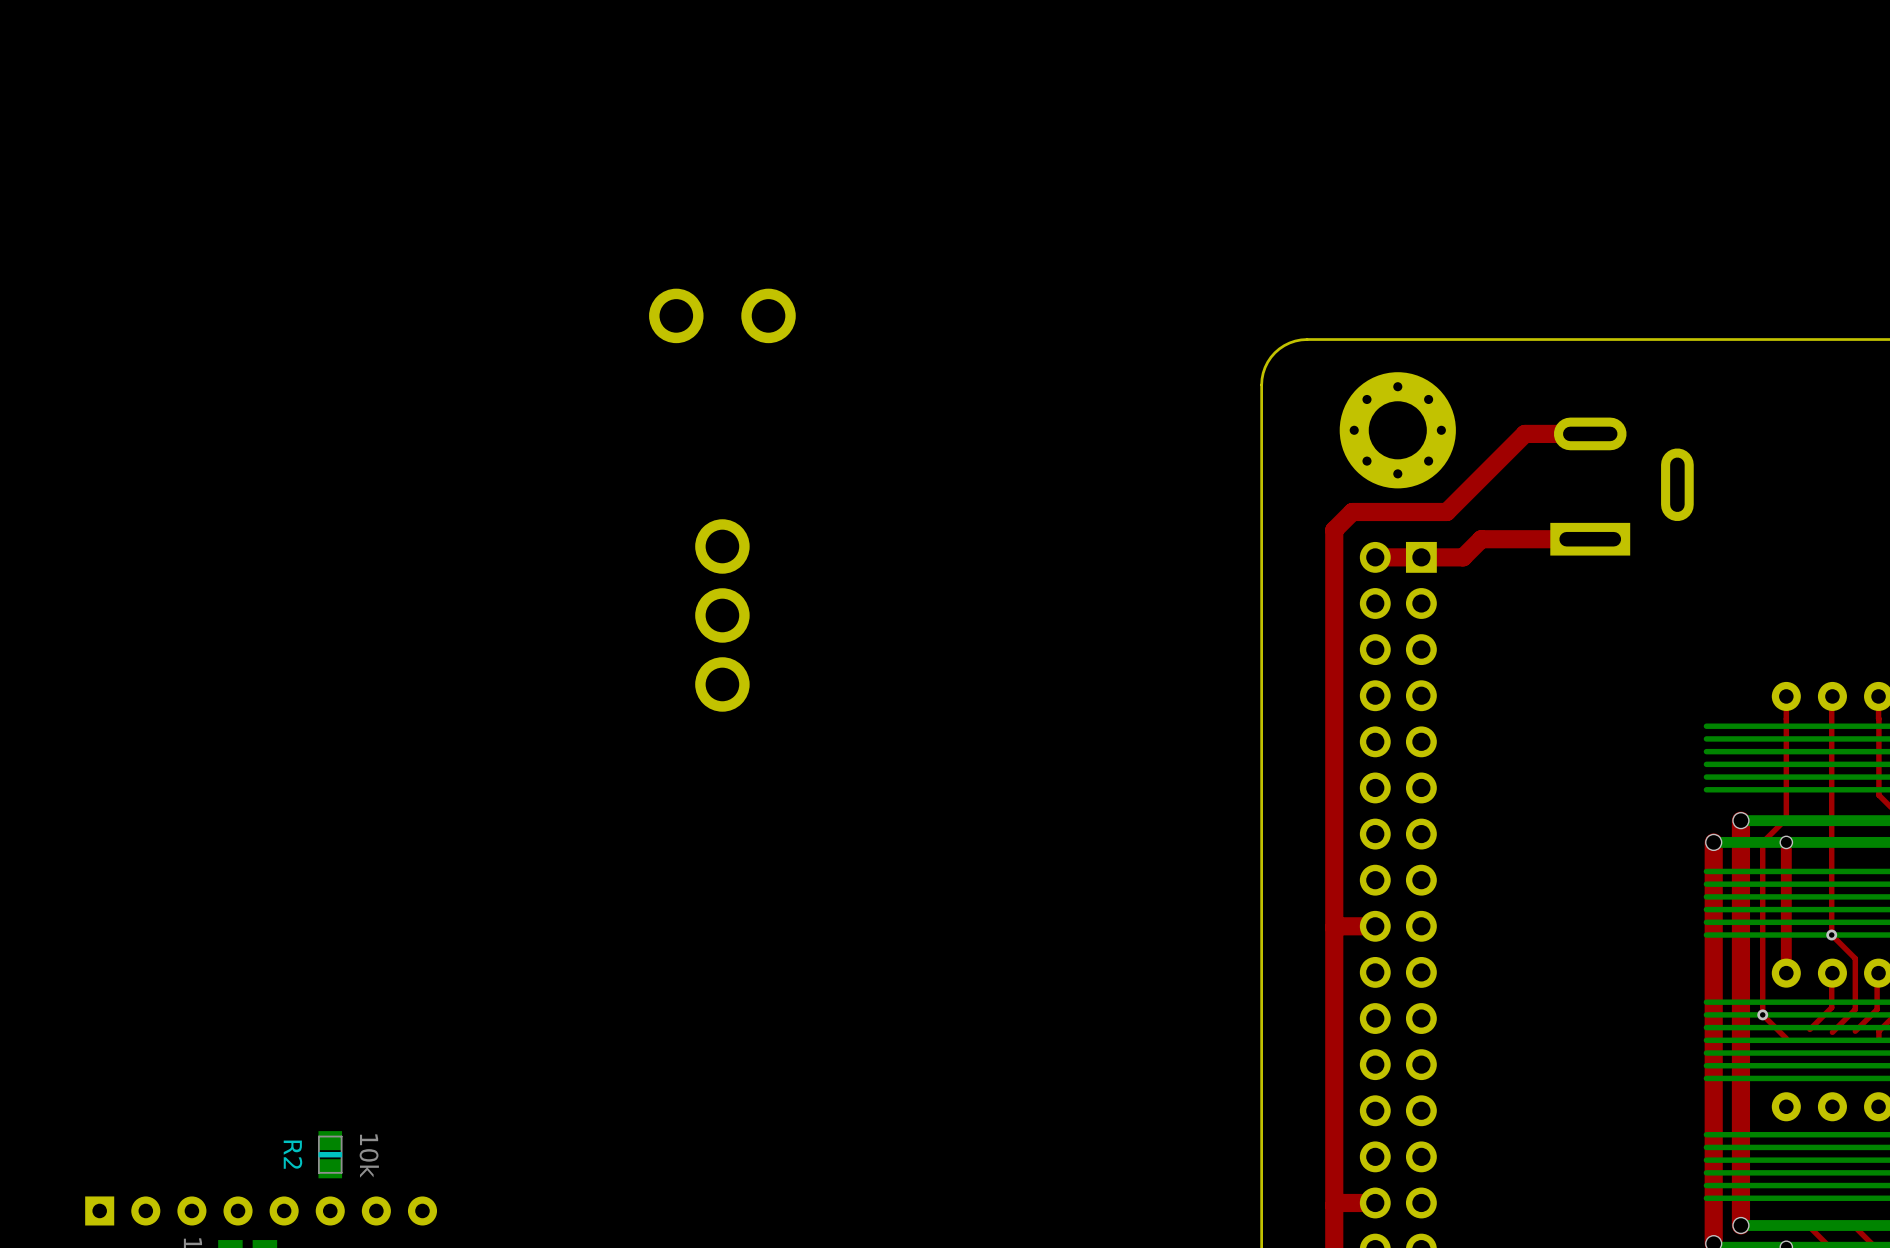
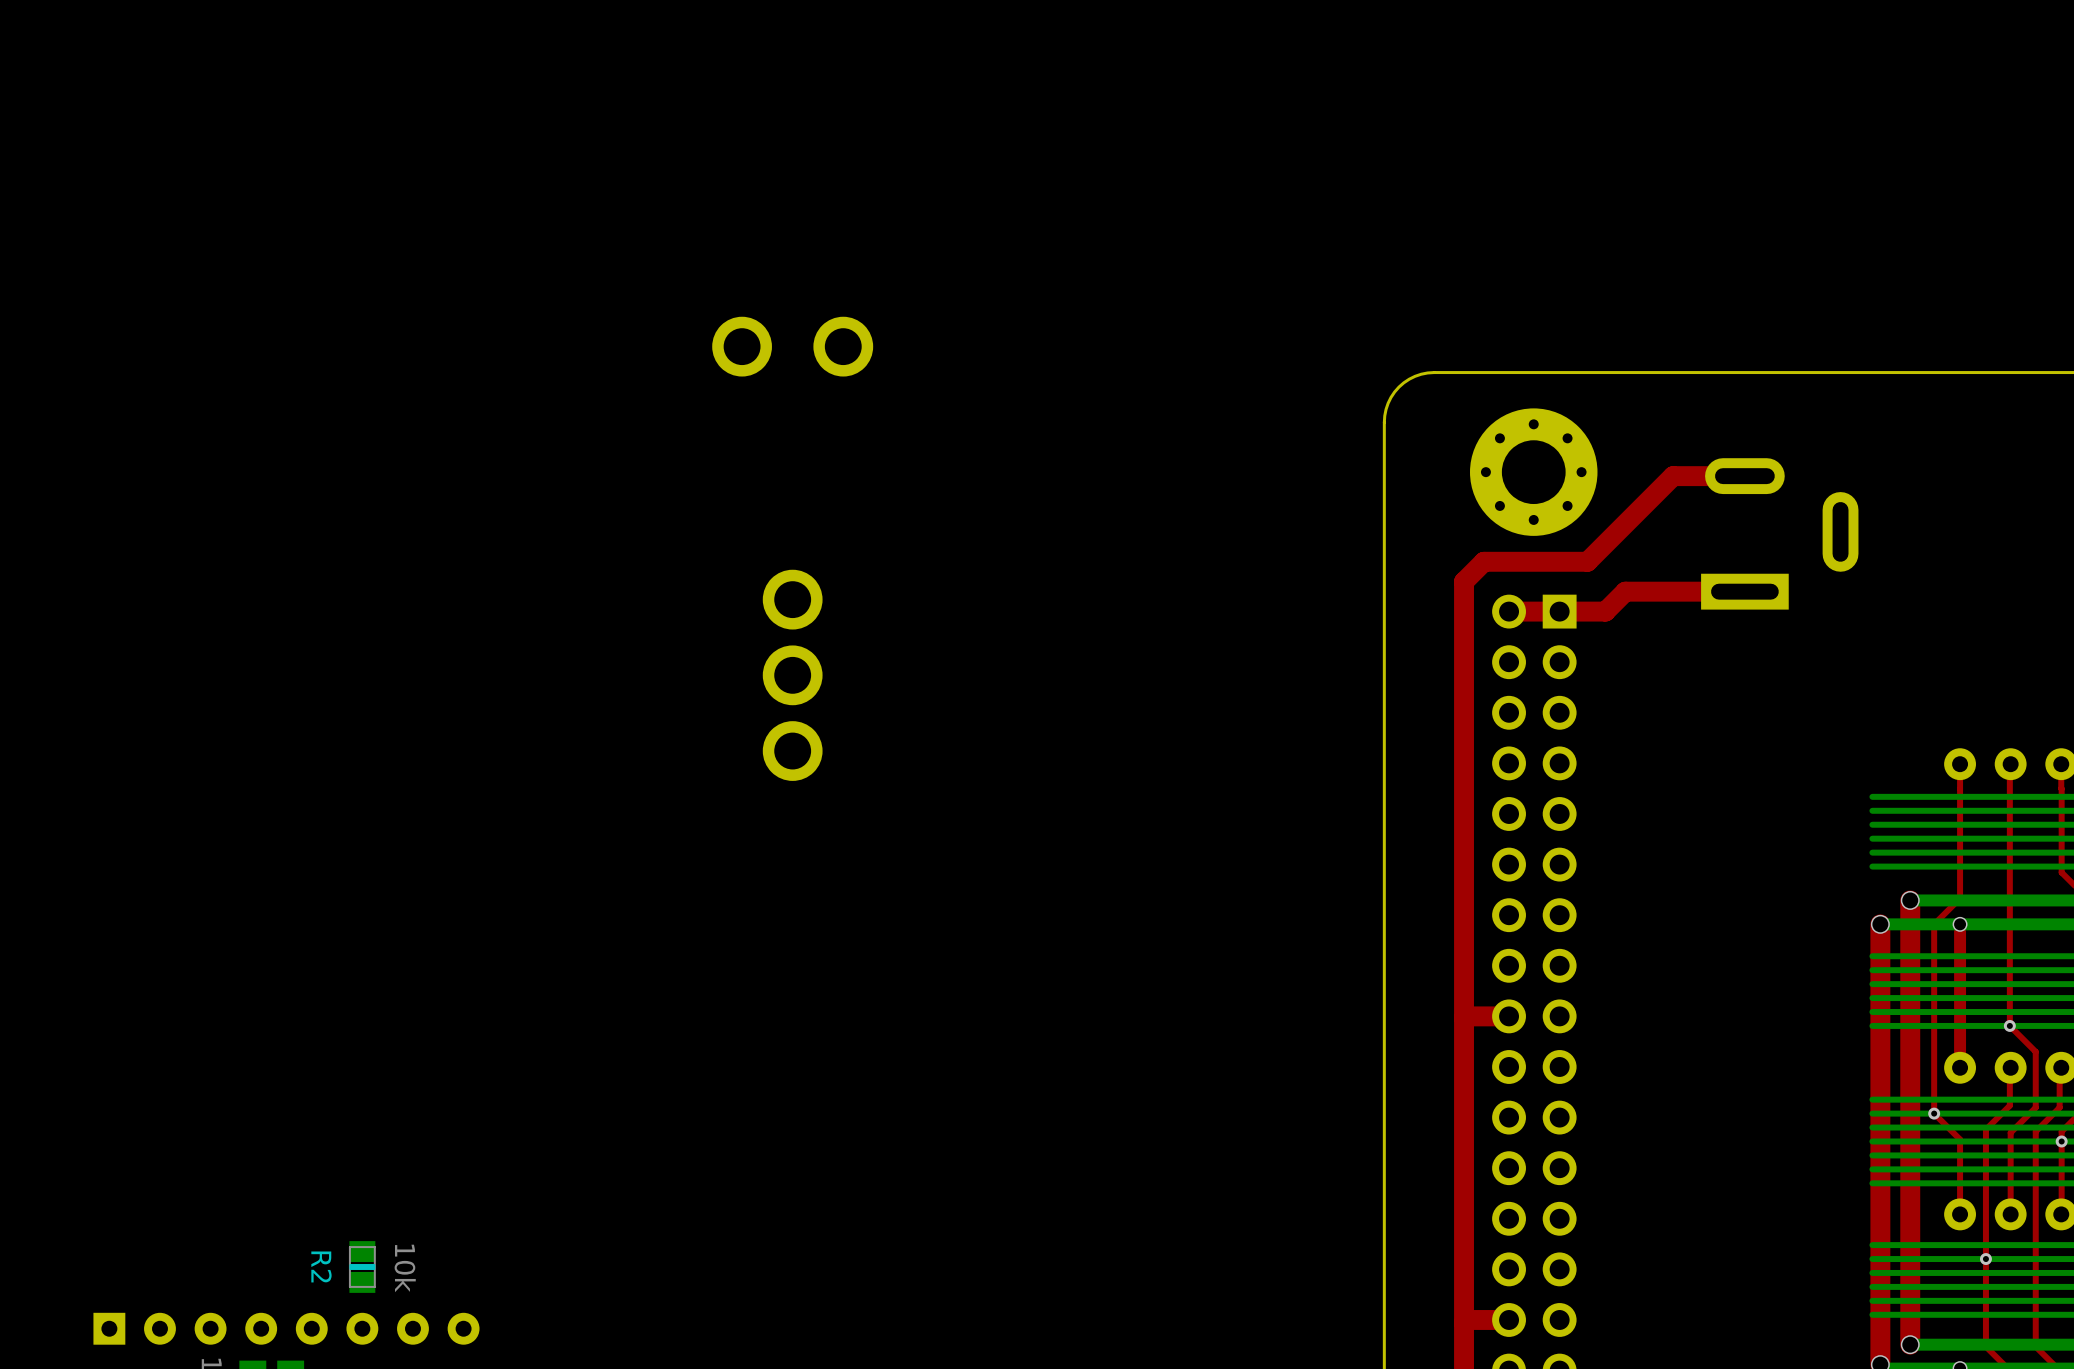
top track: none -> (1985, 1129) (1985, 1346)
top track: none -> (2035, 1131) (2035, 1346)
top track: none -> (2010, 1132) (2010, 1214)
top track: none -> (1960, 1139) (1960, 1214)
top track: none -> (2061, 1141) (2061, 1214)
via: none -> (2061, 1141)
via: none -> (1985, 1259)

